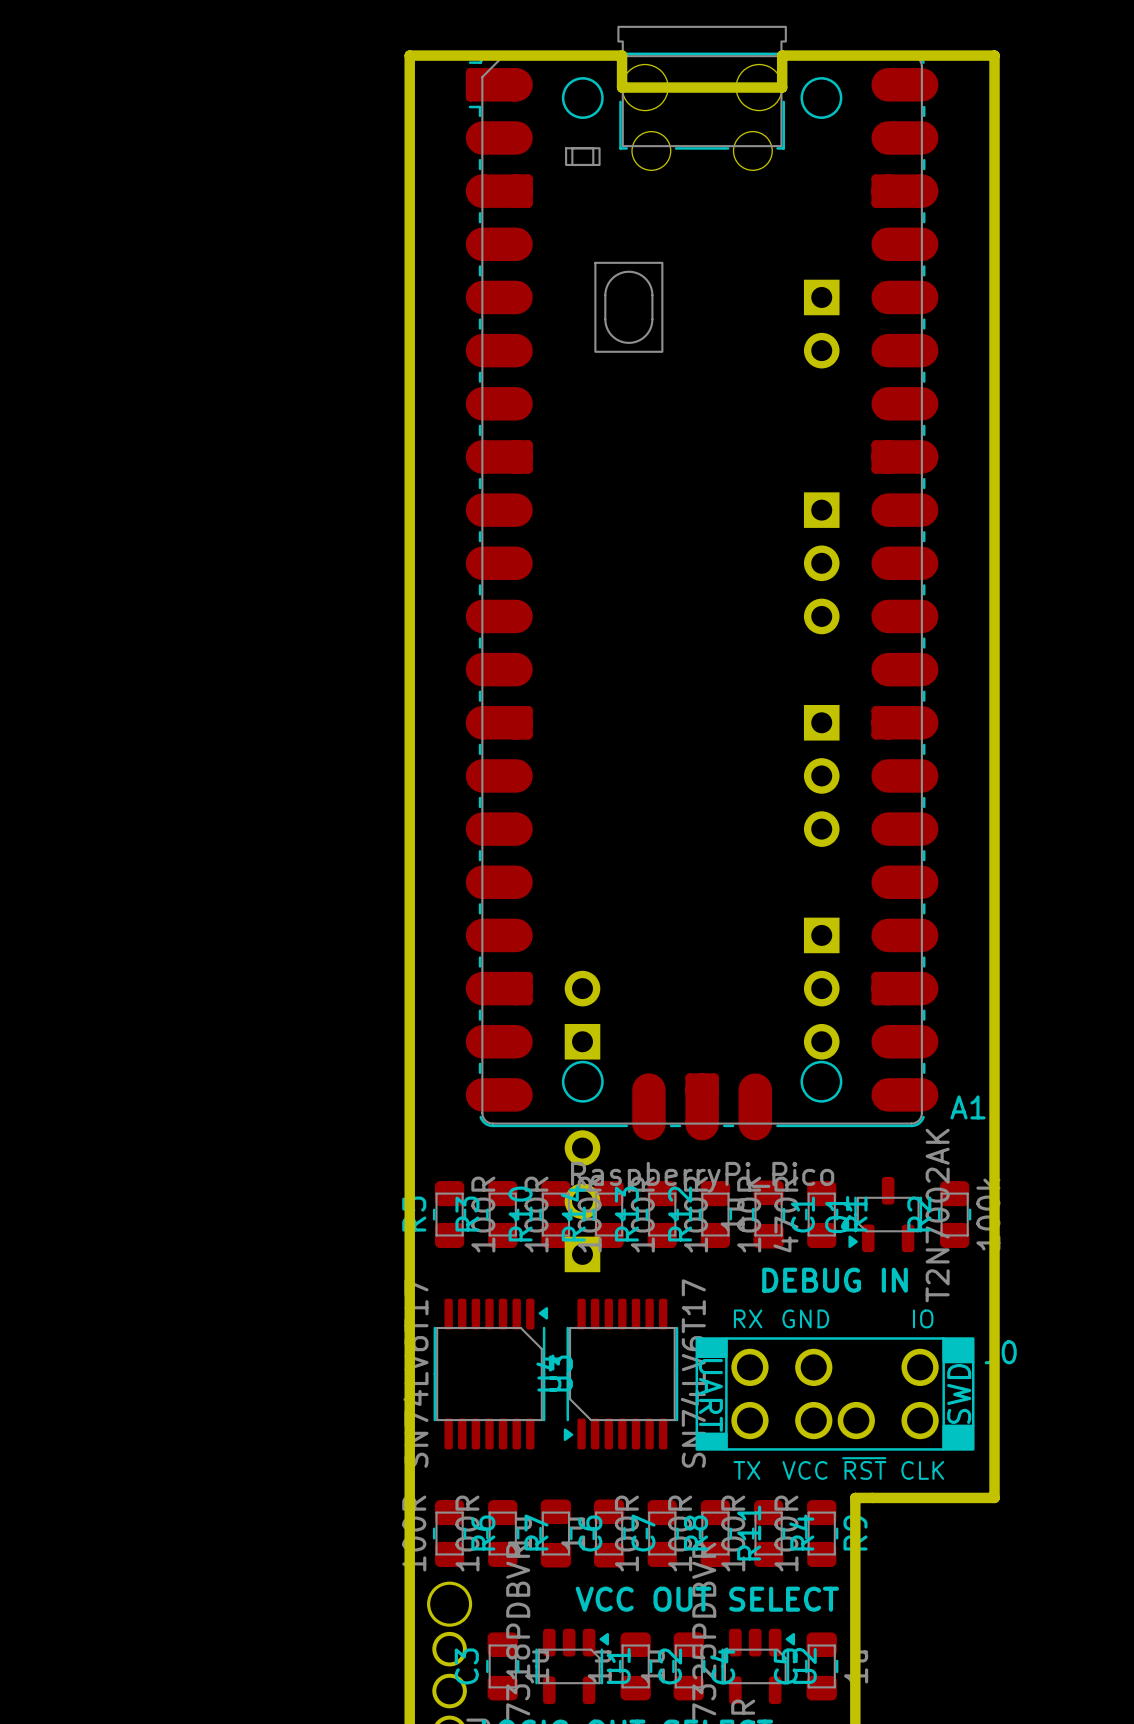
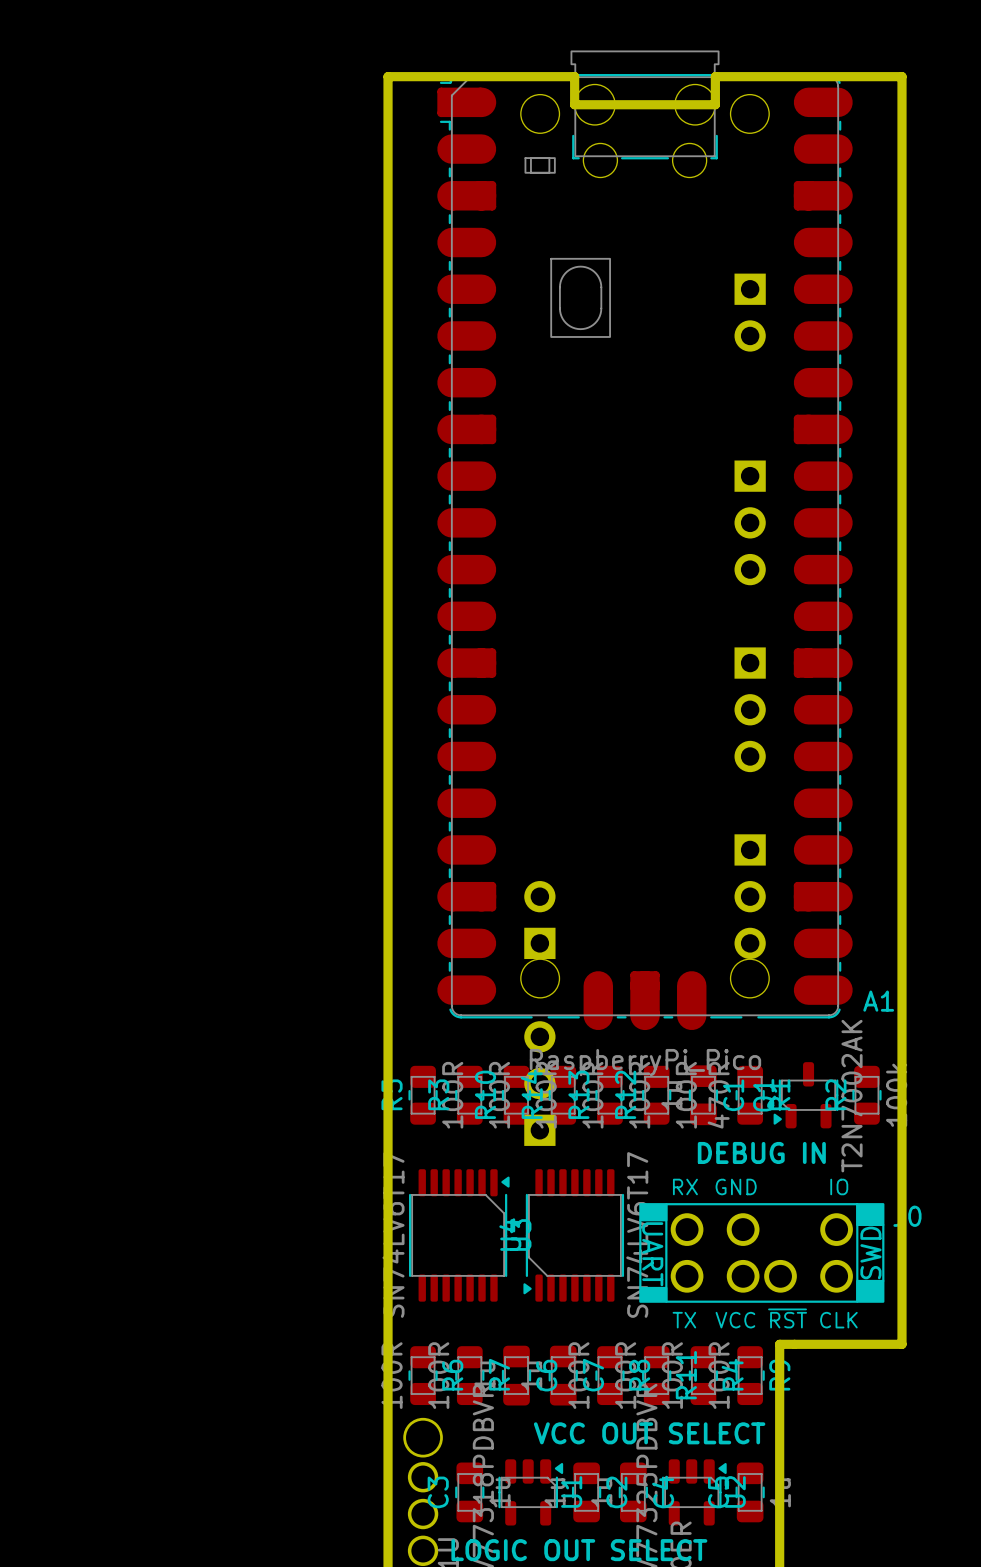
A1 footprint: [465, 25, 939, 1141] -> [437, 50, 853, 1031]

